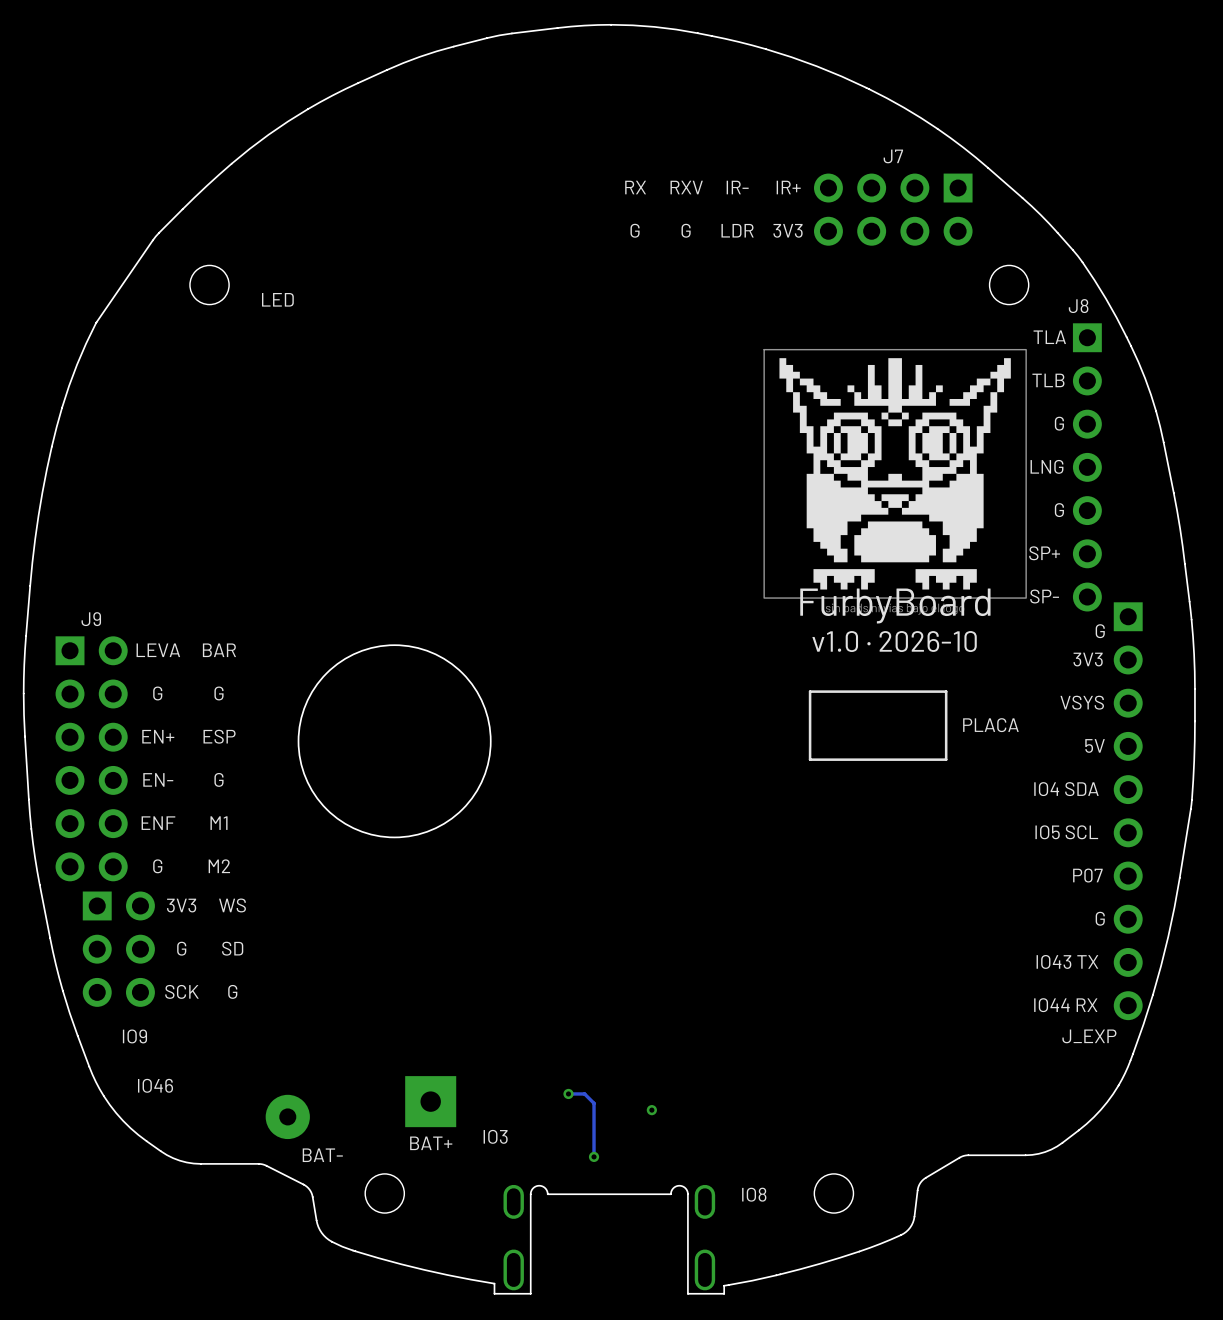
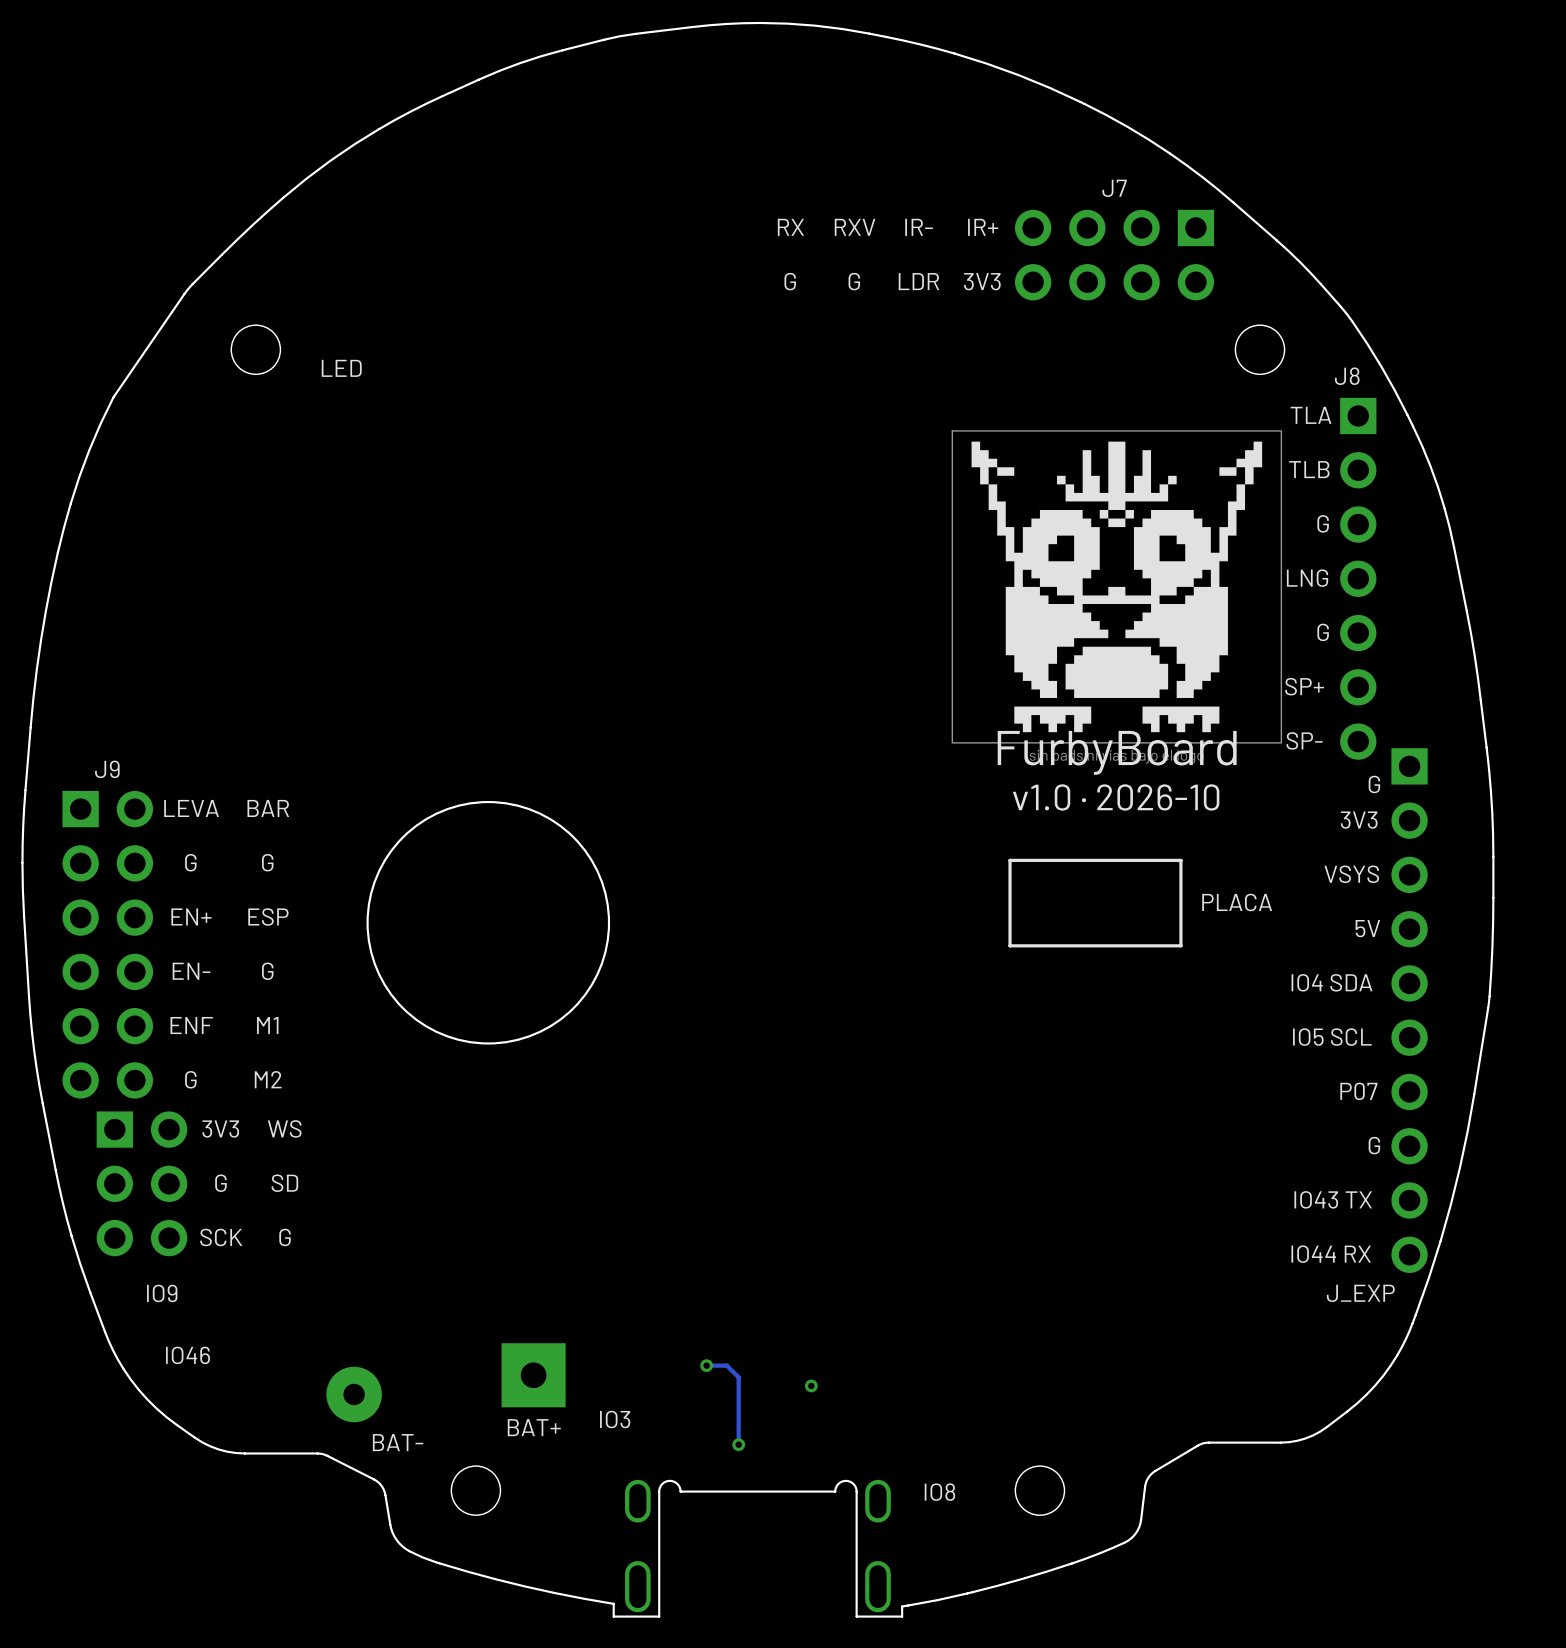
drawing shape: [763, 349, 1027, 615] -> [951, 430, 1282, 764]

